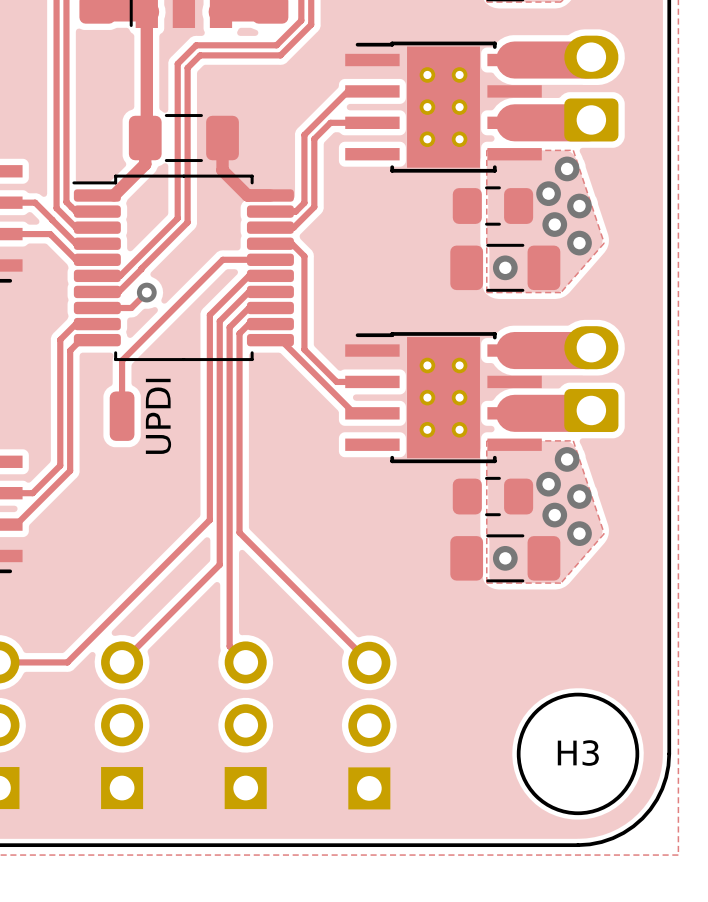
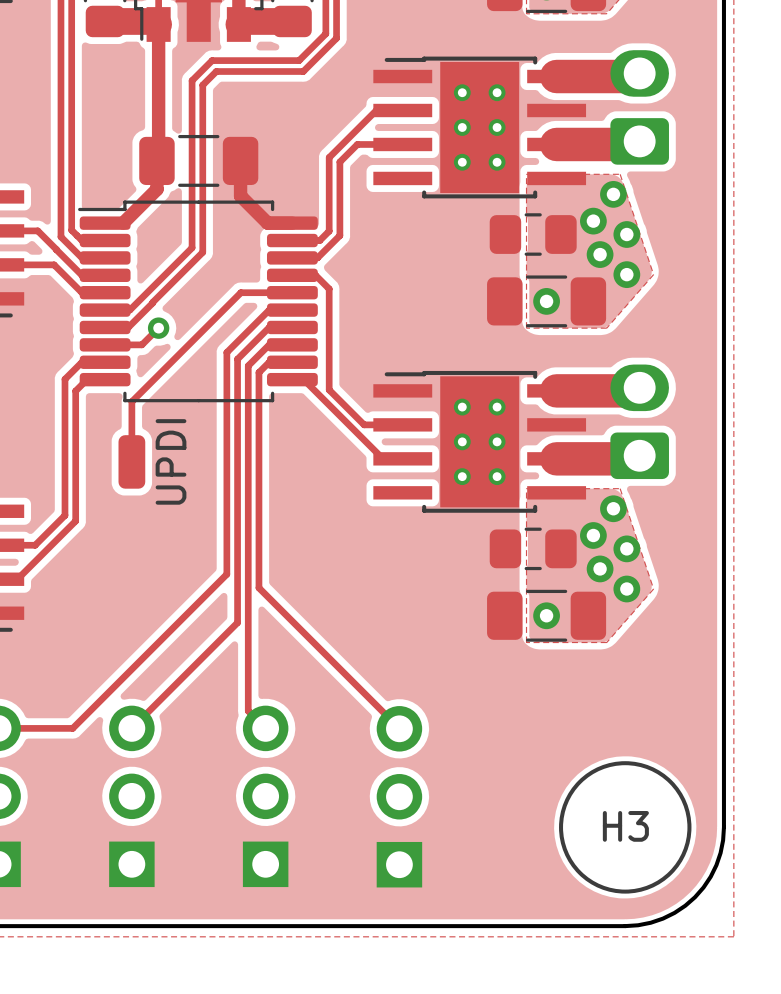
track width: thick (514, 60) (588, 60) -> thin (556, 76) (636, 76)
track width: thick (514, 122) (588, 122) -> thin (556, 144) (636, 144)
track width: thick (514, 350) (588, 350) -> thin (556, 390) (636, 390)
track width: thick (514, 413) (588, 413) -> thin (556, 458) (636, 458)

